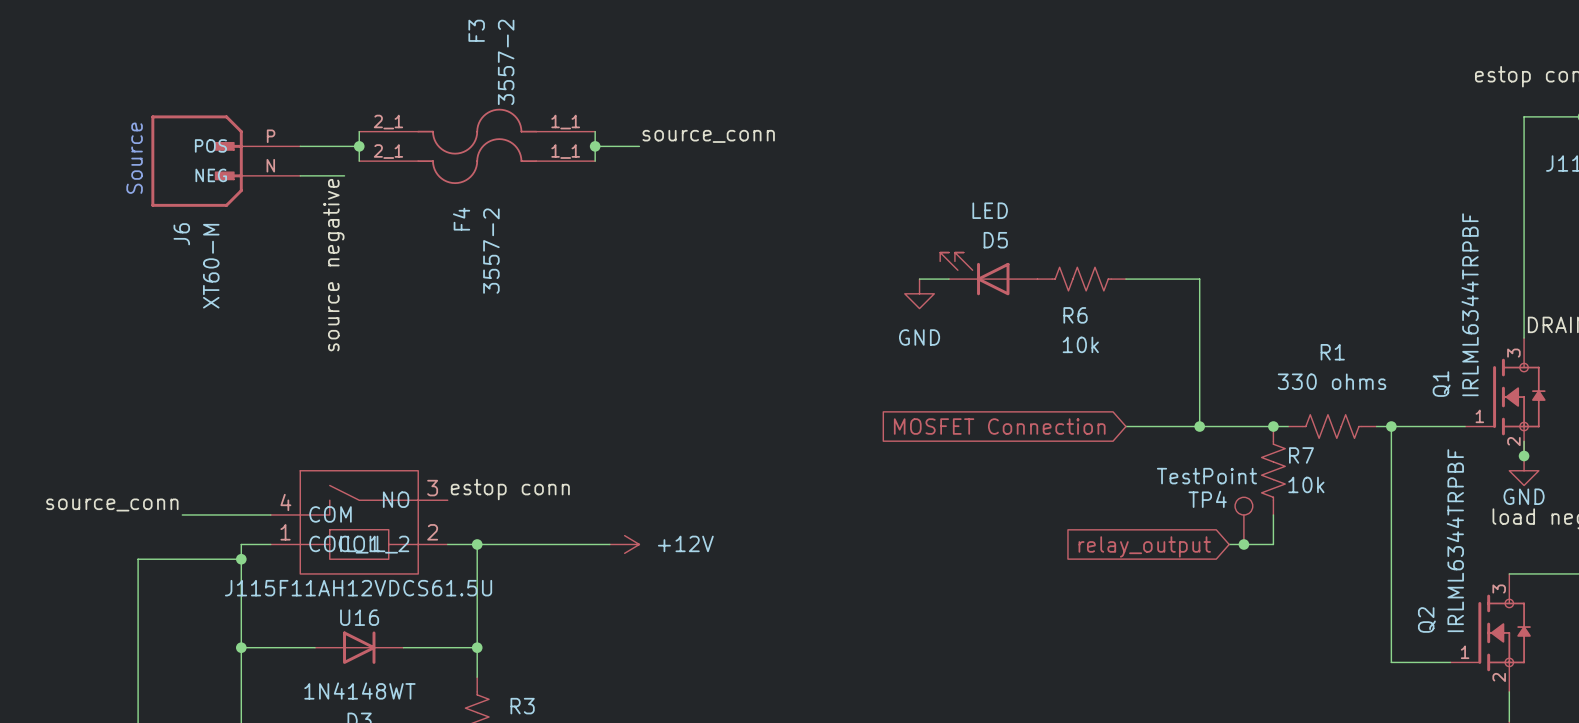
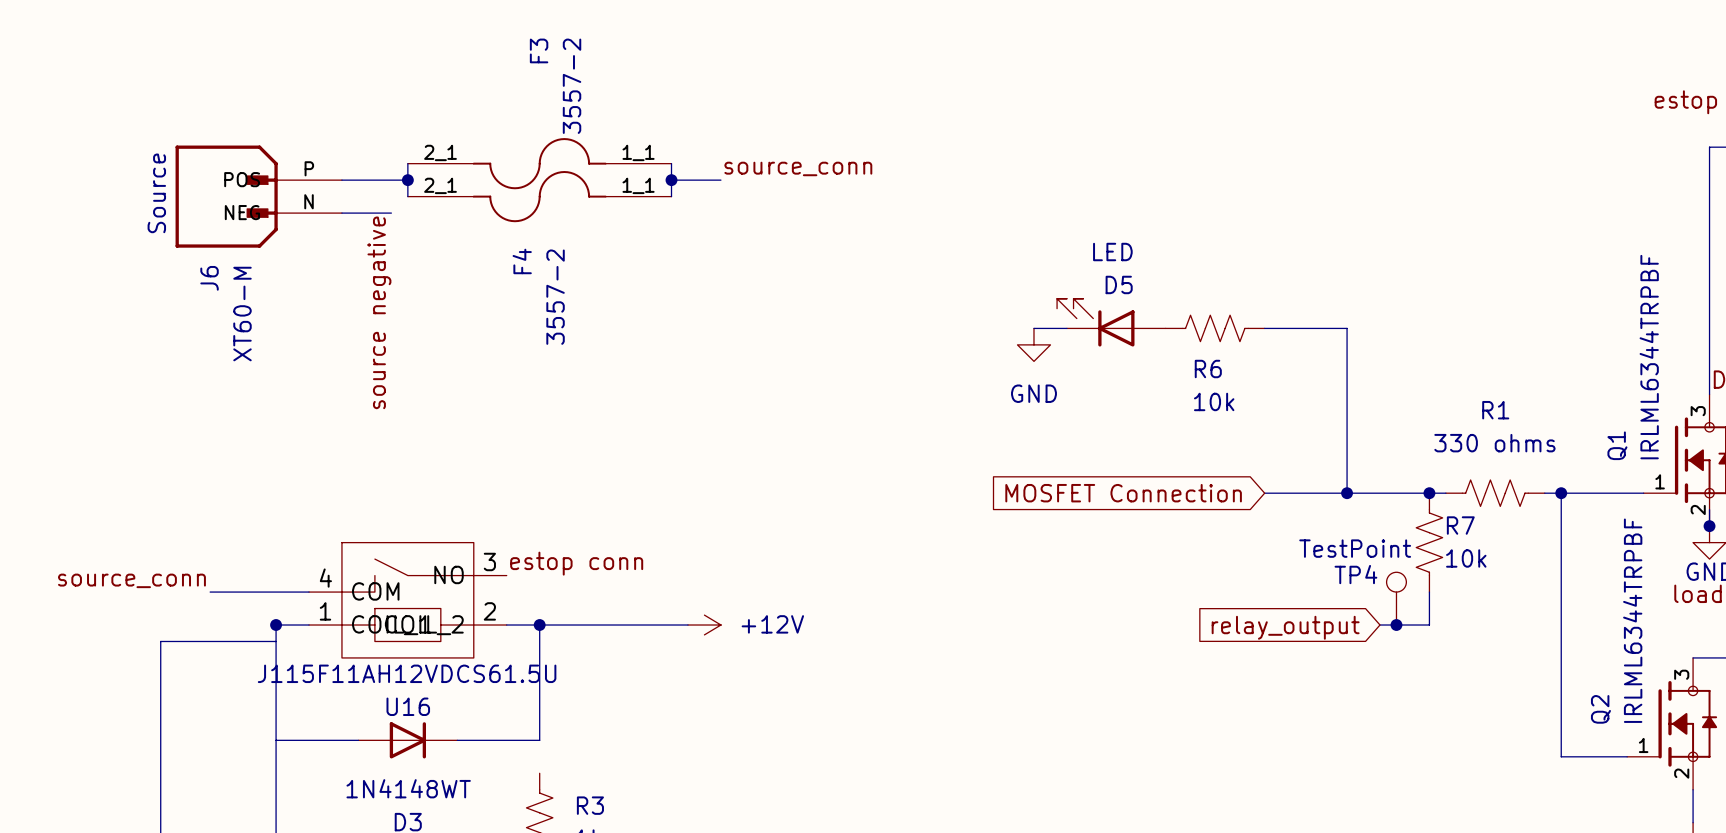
junction position: (241, 559) -> (276, 625)
junction: (241, 647) -> none
wire: (477, 647) (477, 677) -> none
junction: (477, 647) -> none

